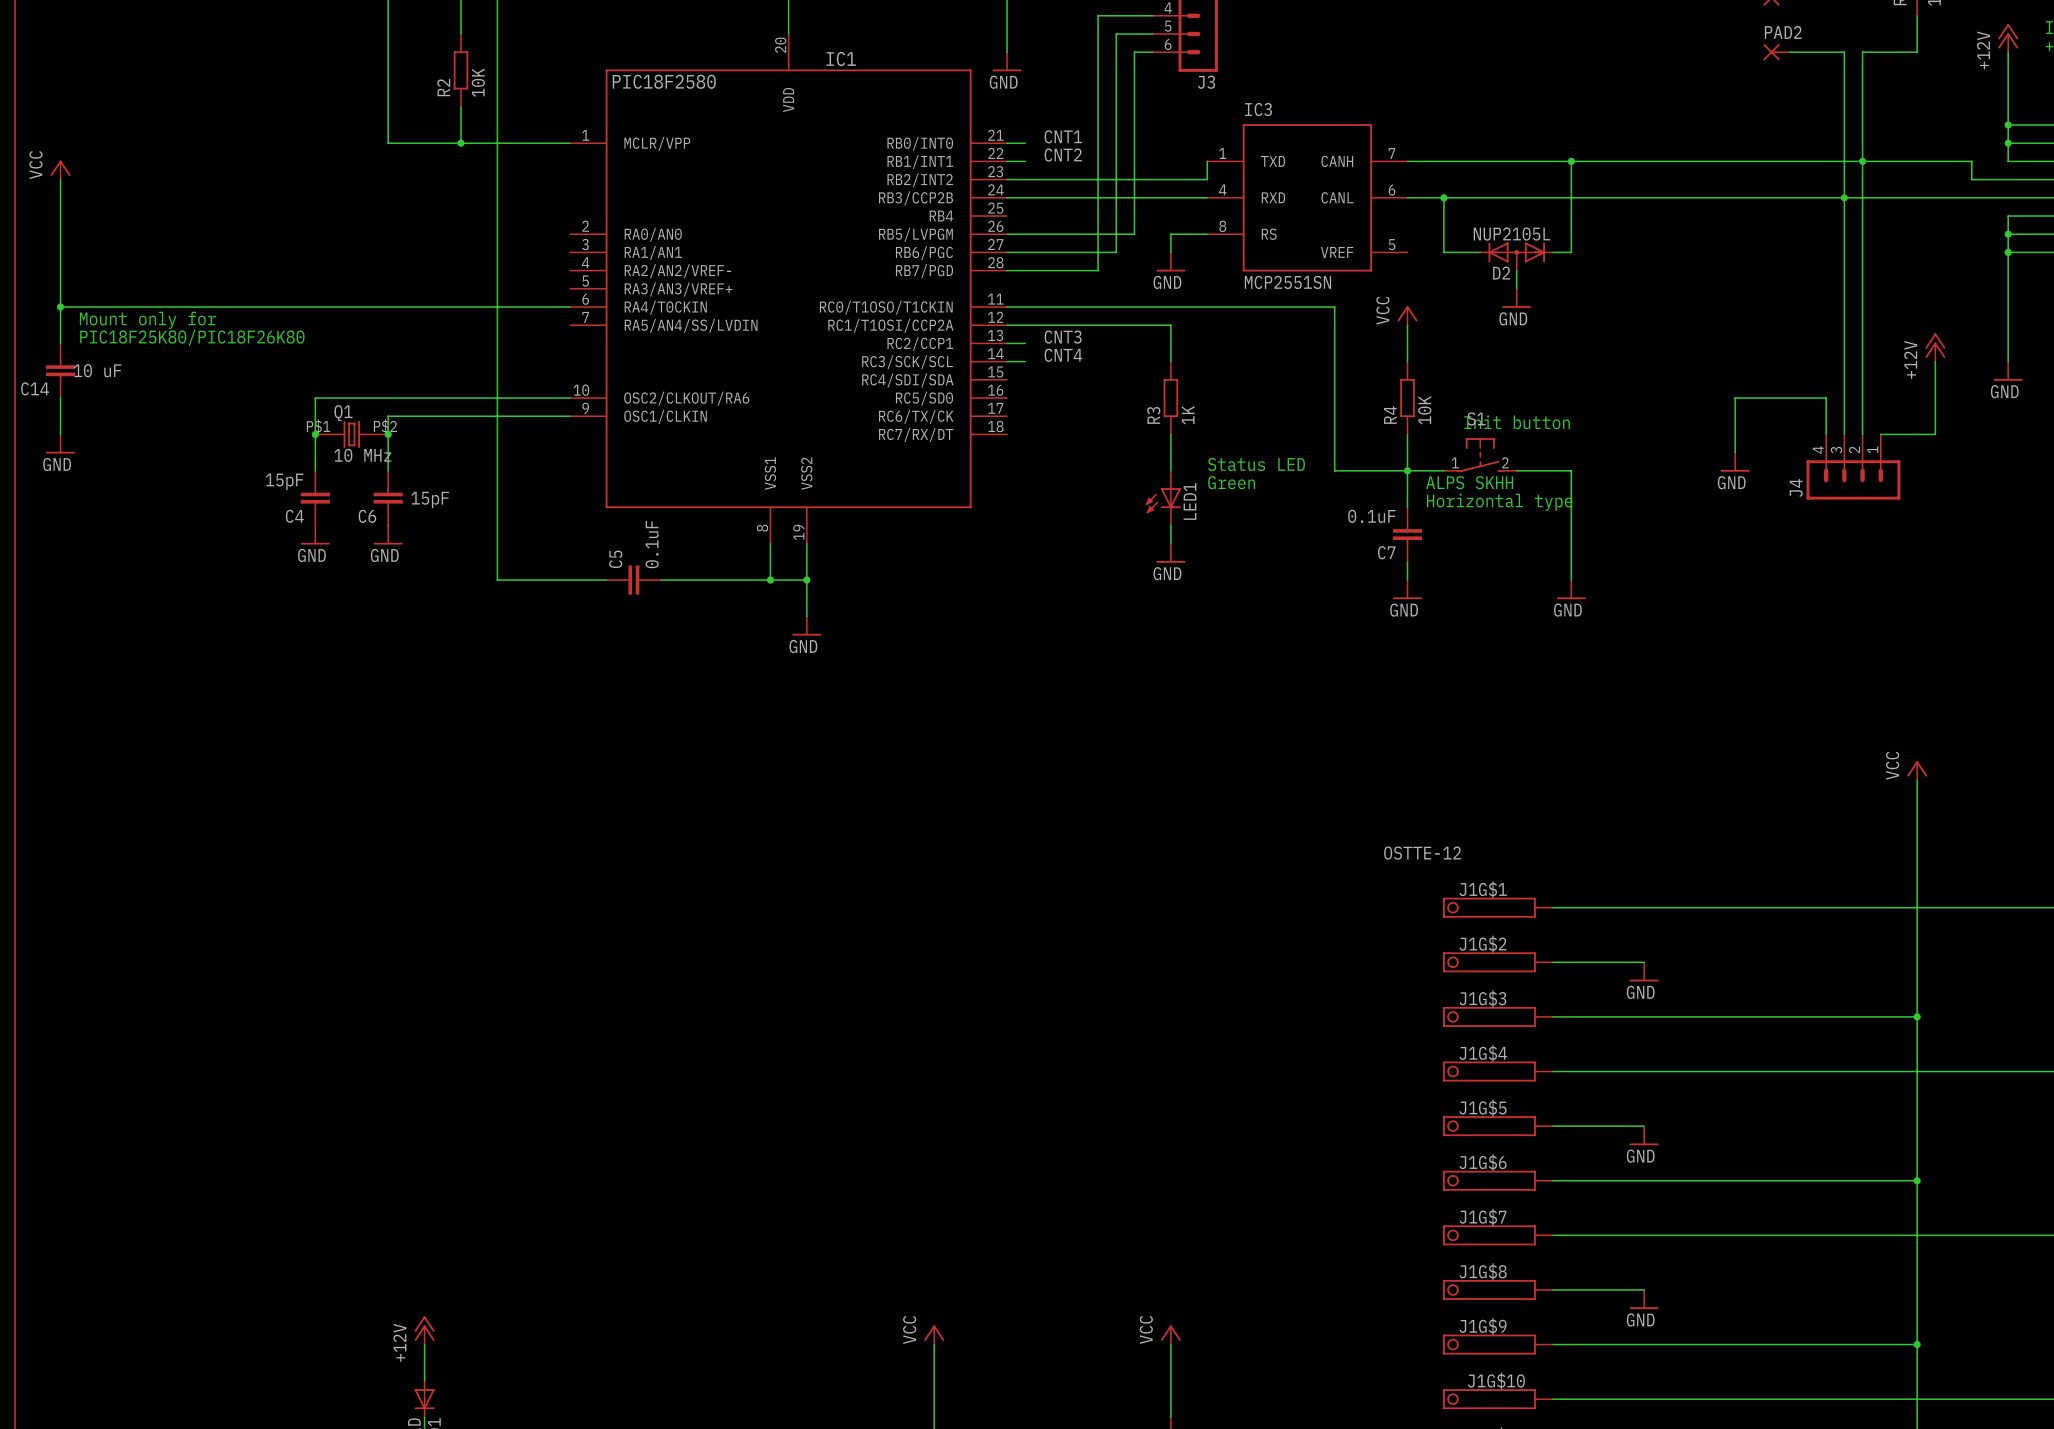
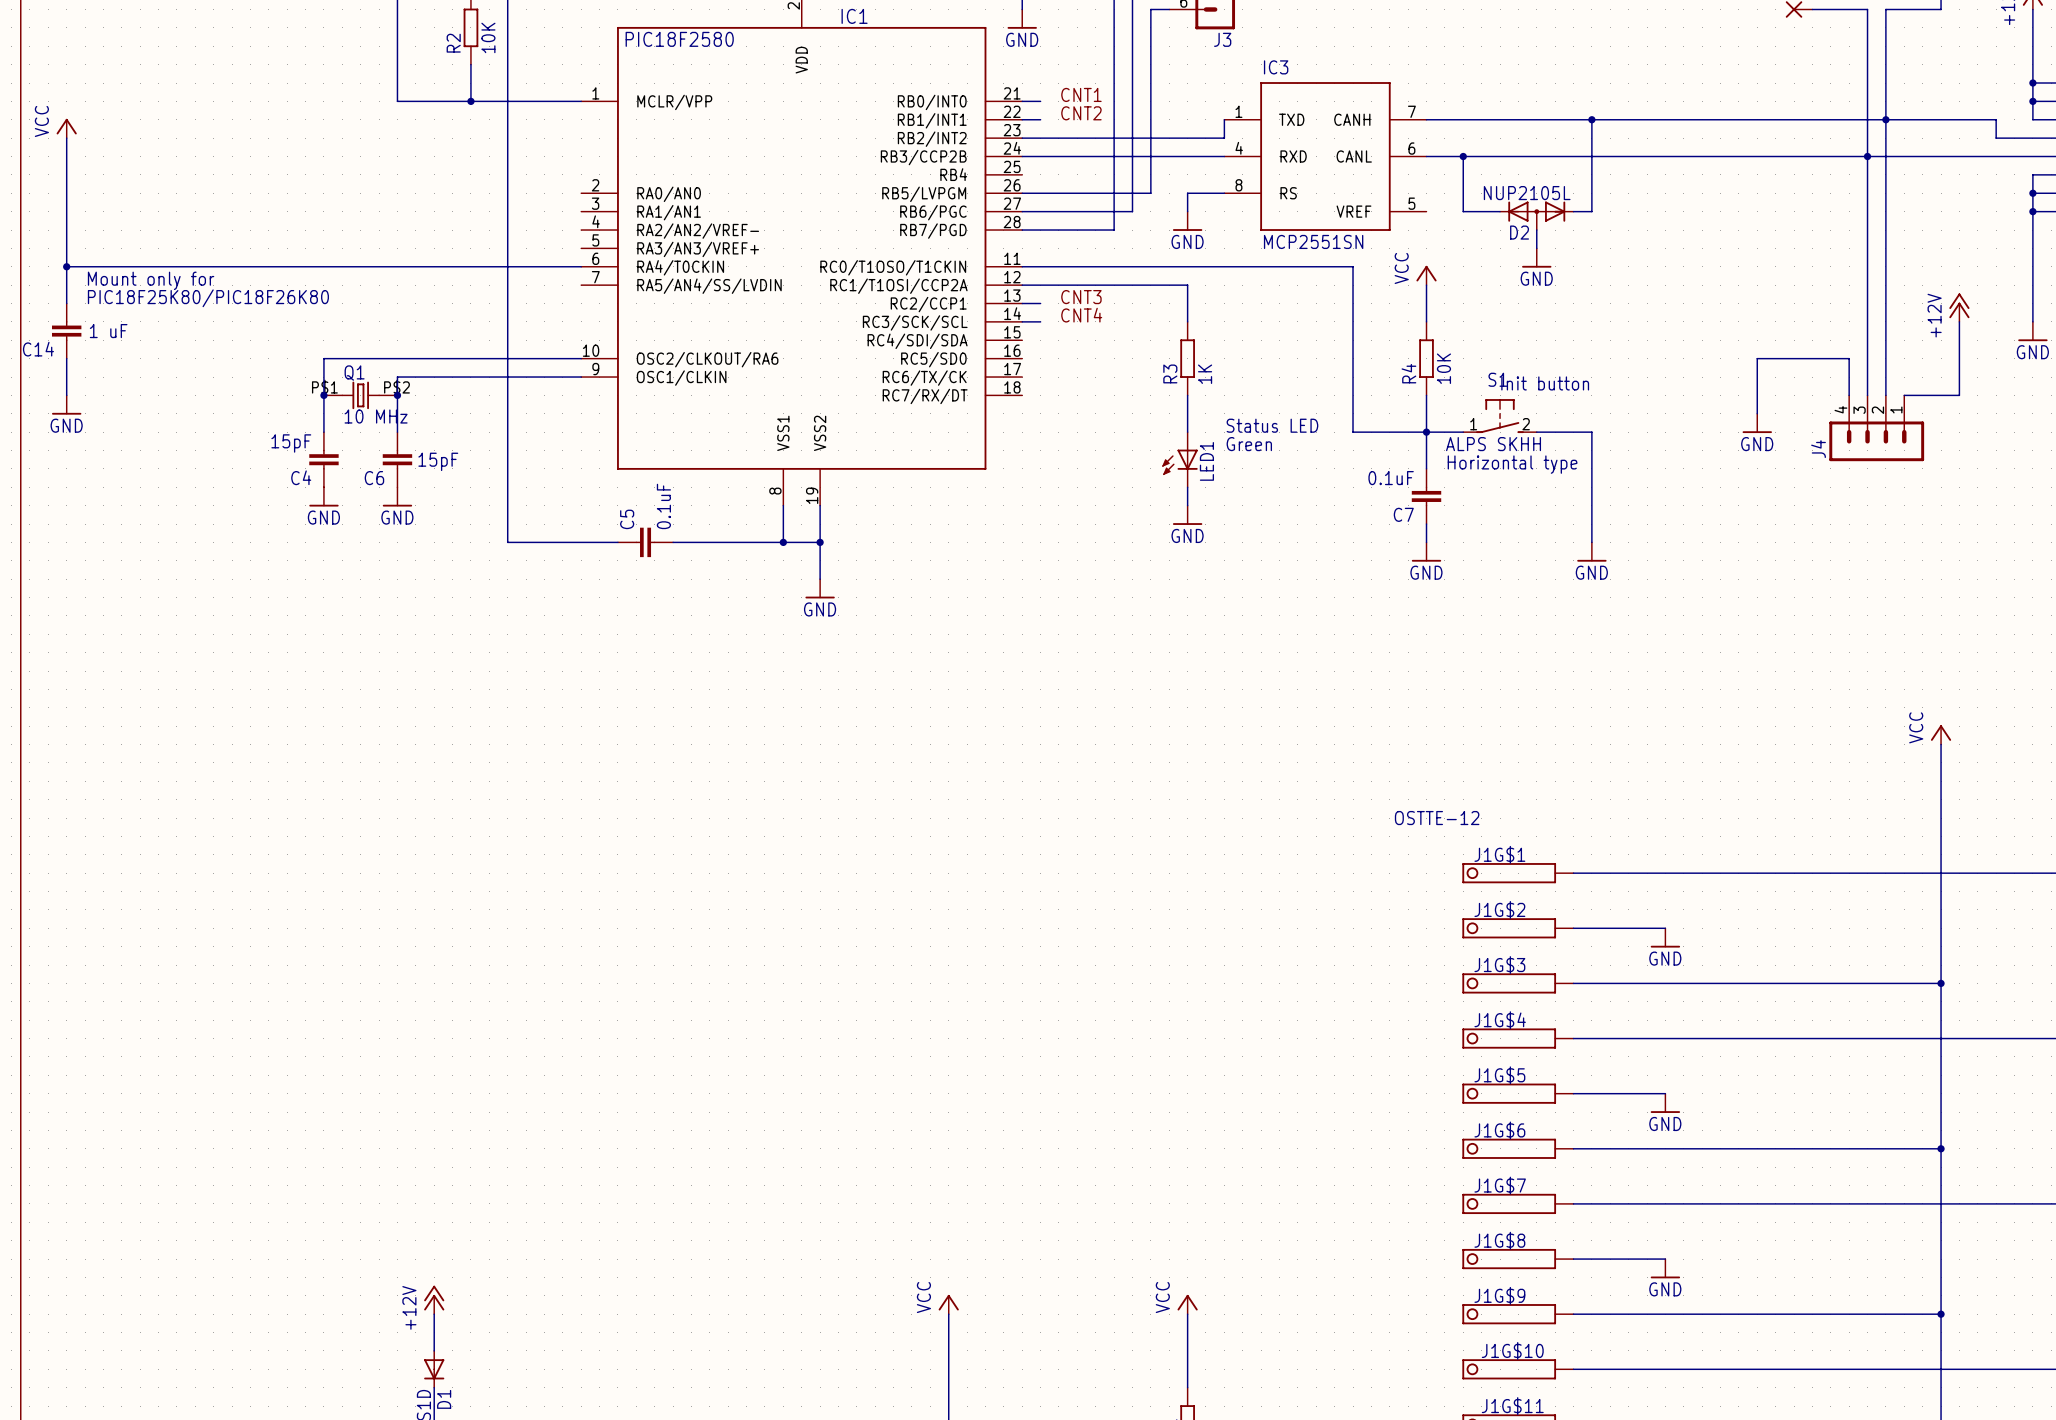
C14 value: 10 uF (97, 370) -> 1 uF (108, 331)

